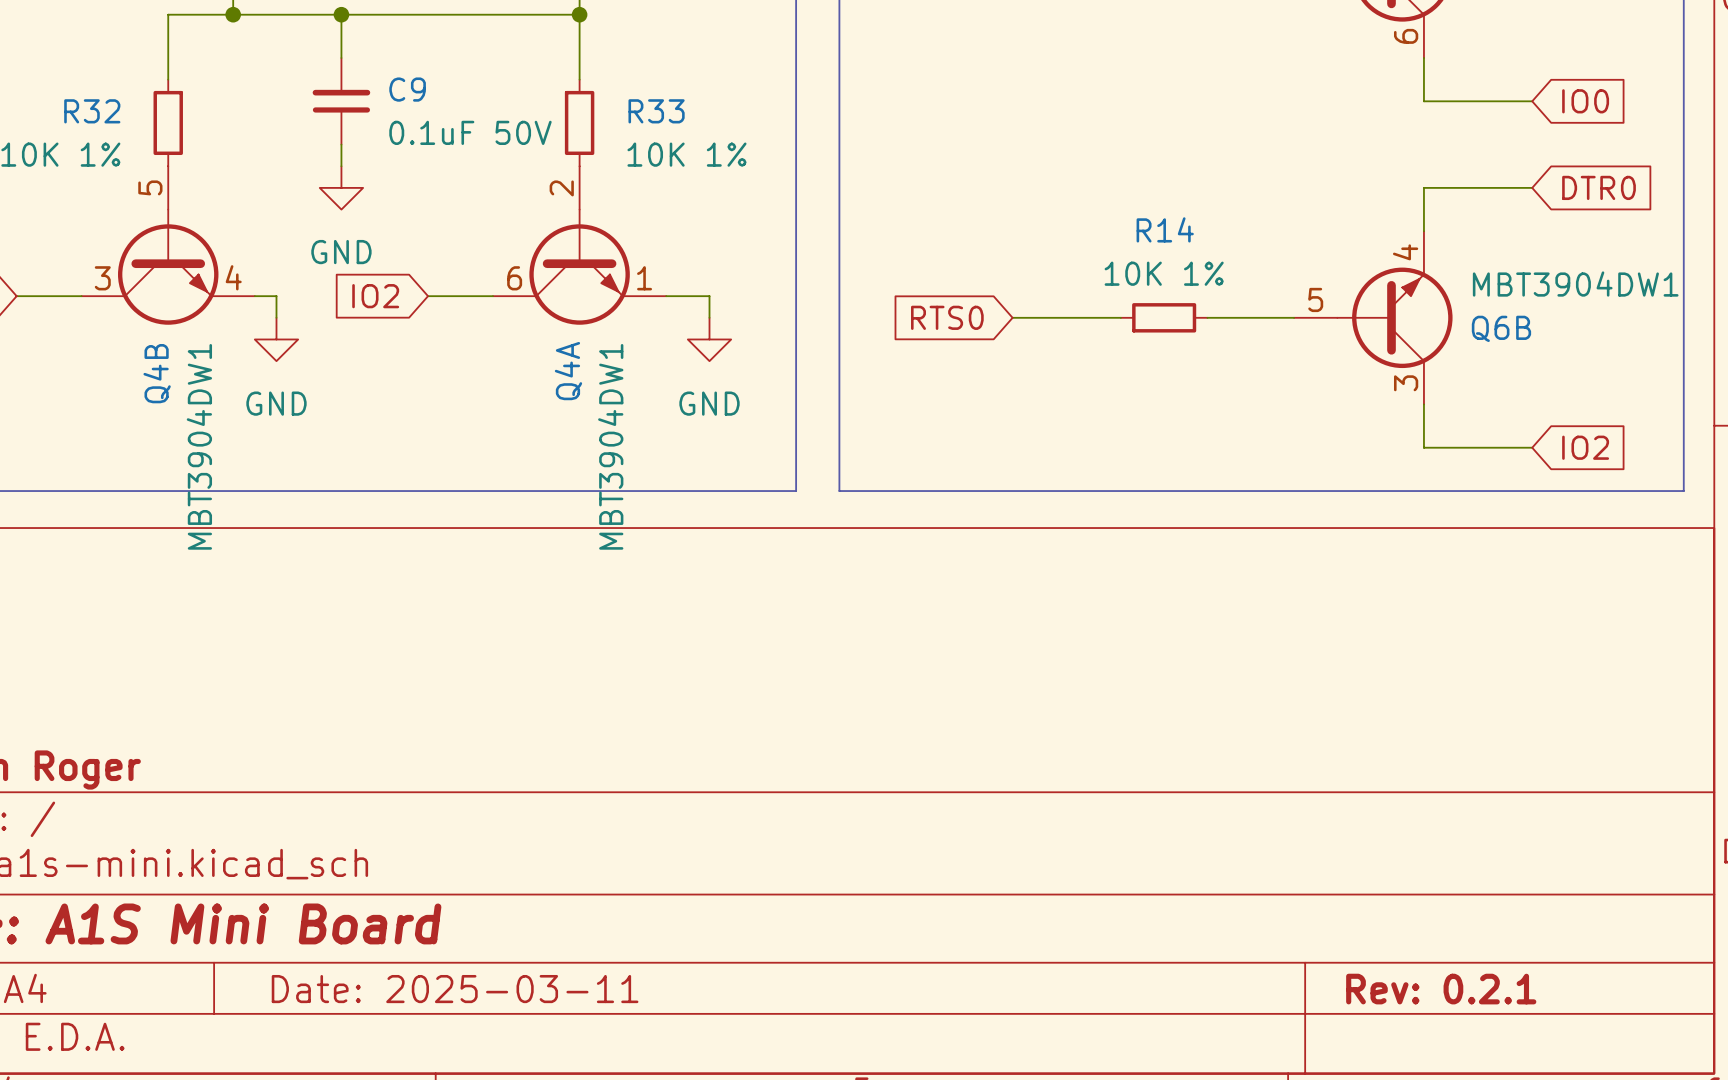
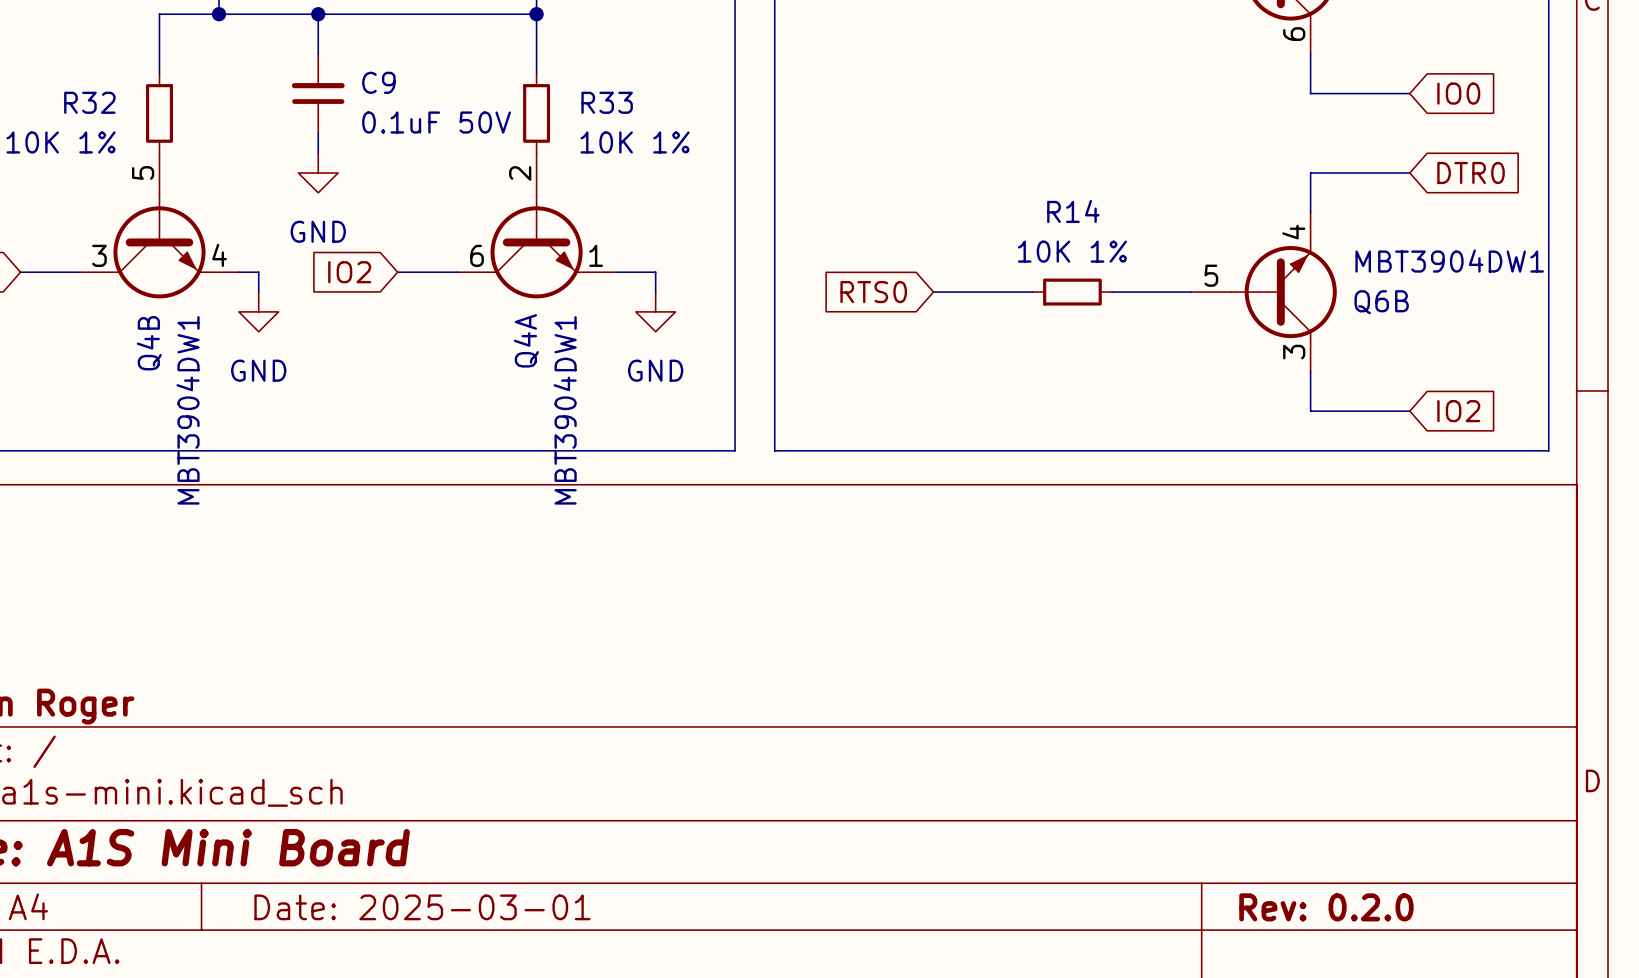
title block: Date: 2025-03-11 (455, 989) -> Date: 2025-03-01 (422, 907)
title block: Rev: 0.2.1 (1441, 989) -> Rev: 0.2.0 (1326, 907)

